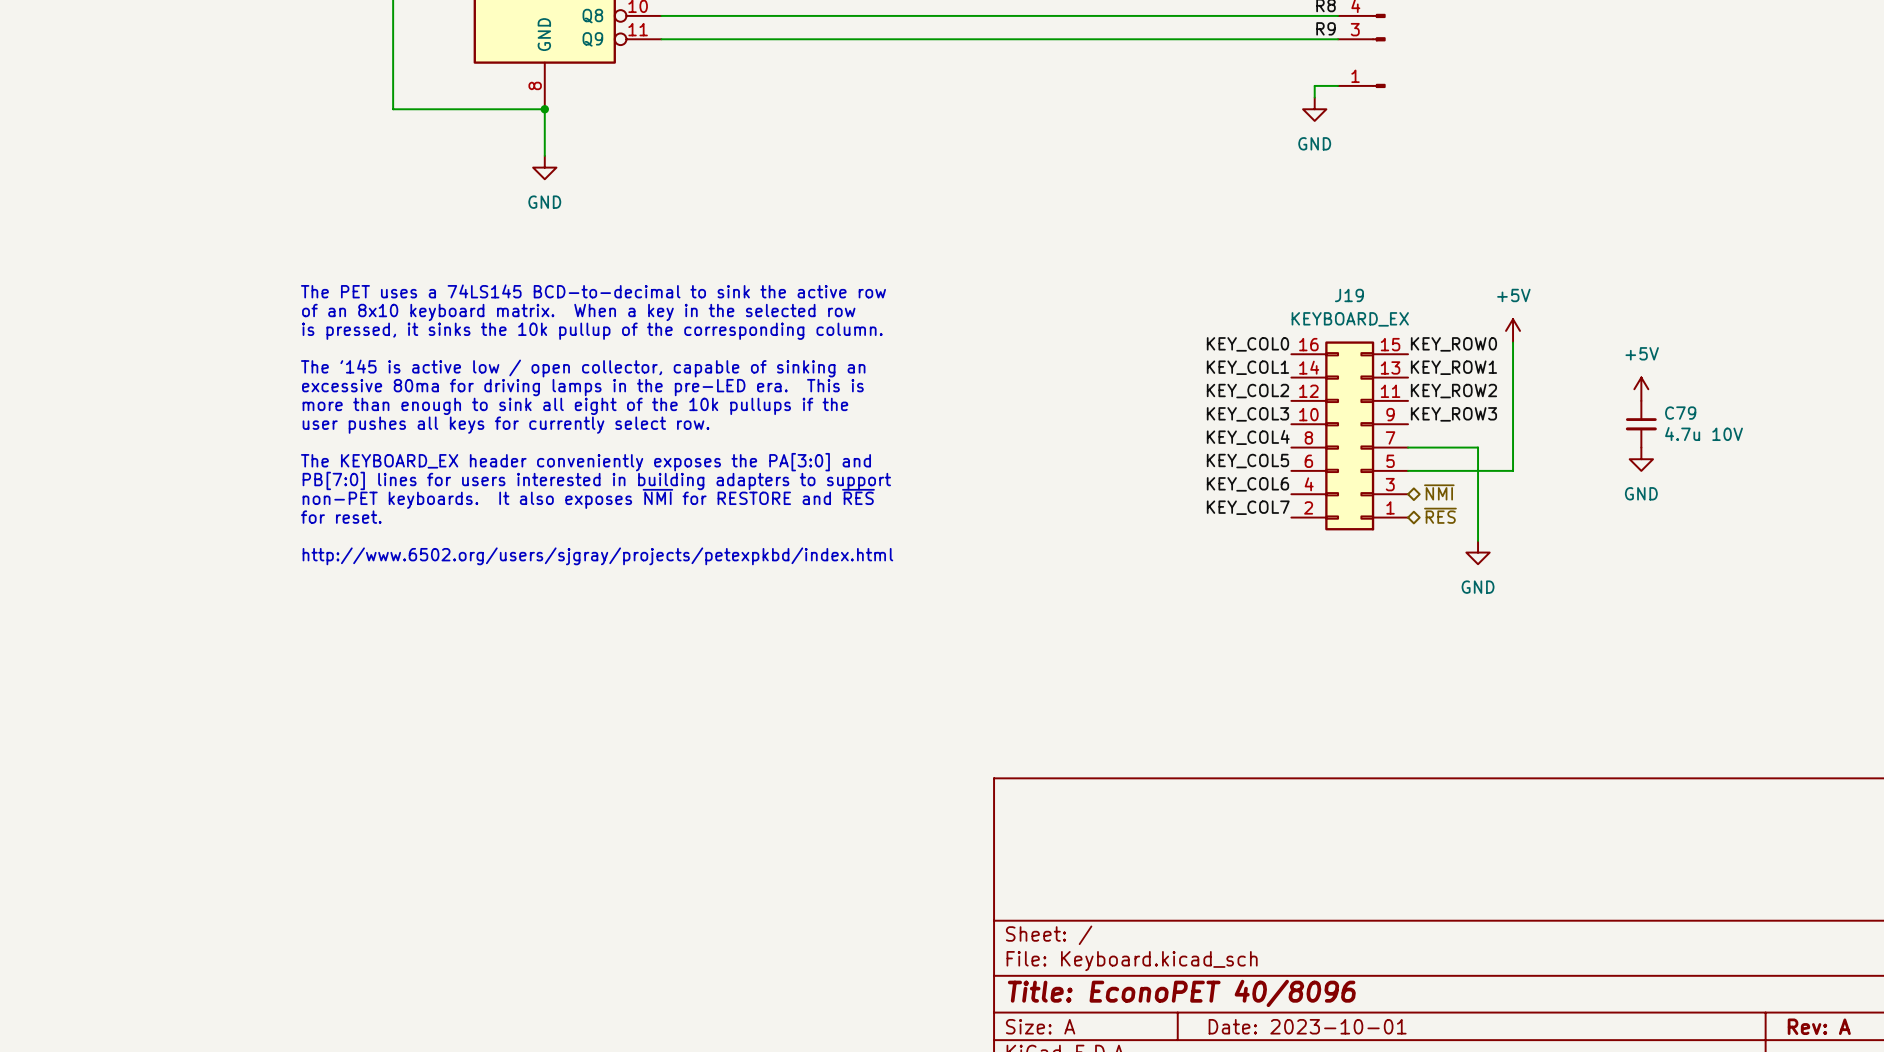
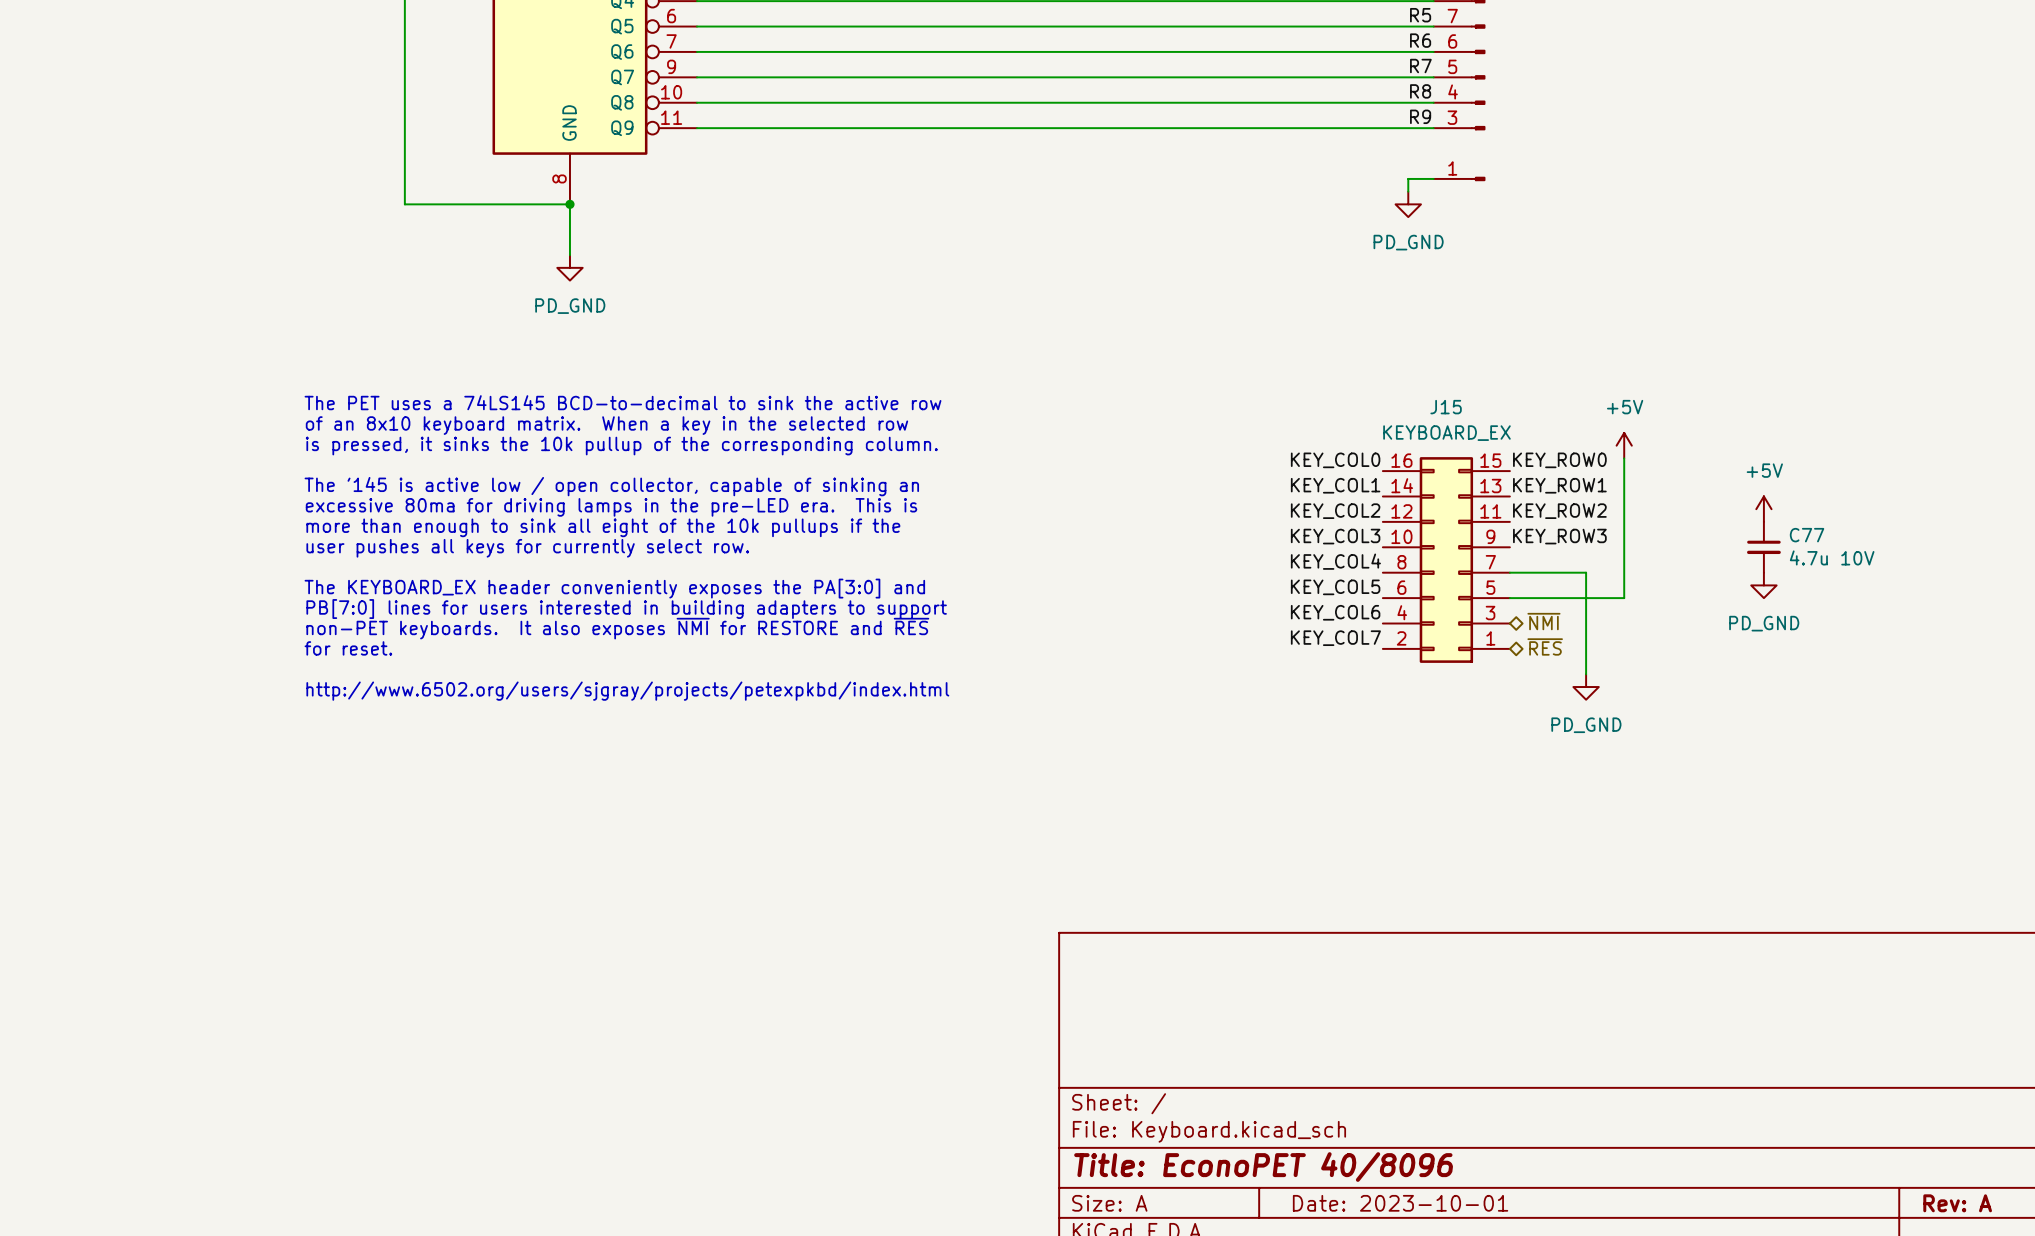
power symbol: GND (1314, 109) -> PD_GND (1408, 204)
power symbol: GND (544, 167) -> PD_GND (569, 267)
J19 name: J19 (1349, 295) -> J15 (1446, 407)
C79 name: C79 (1680, 413) -> C77 (1807, 535)
power symbol: GND (1641, 459) -> PD_GND (1763, 585)
power symbol: GND (1478, 552) -> PD_GND (1586, 687)

